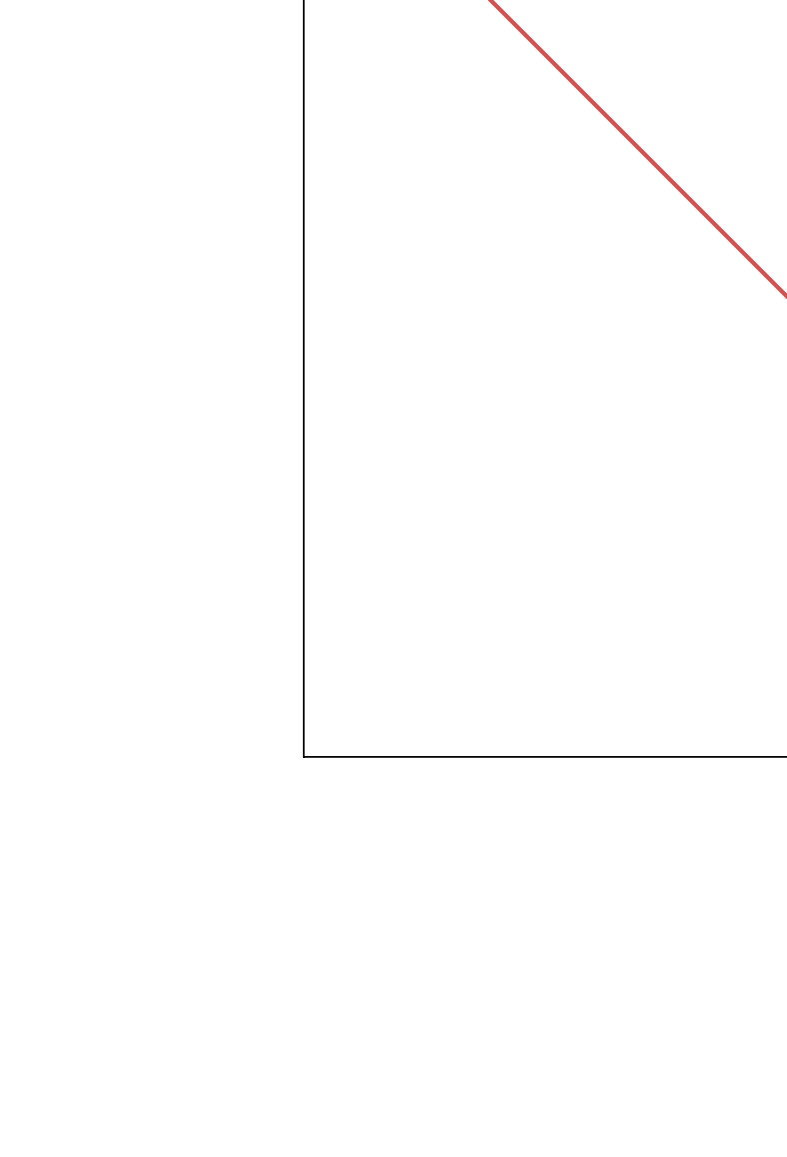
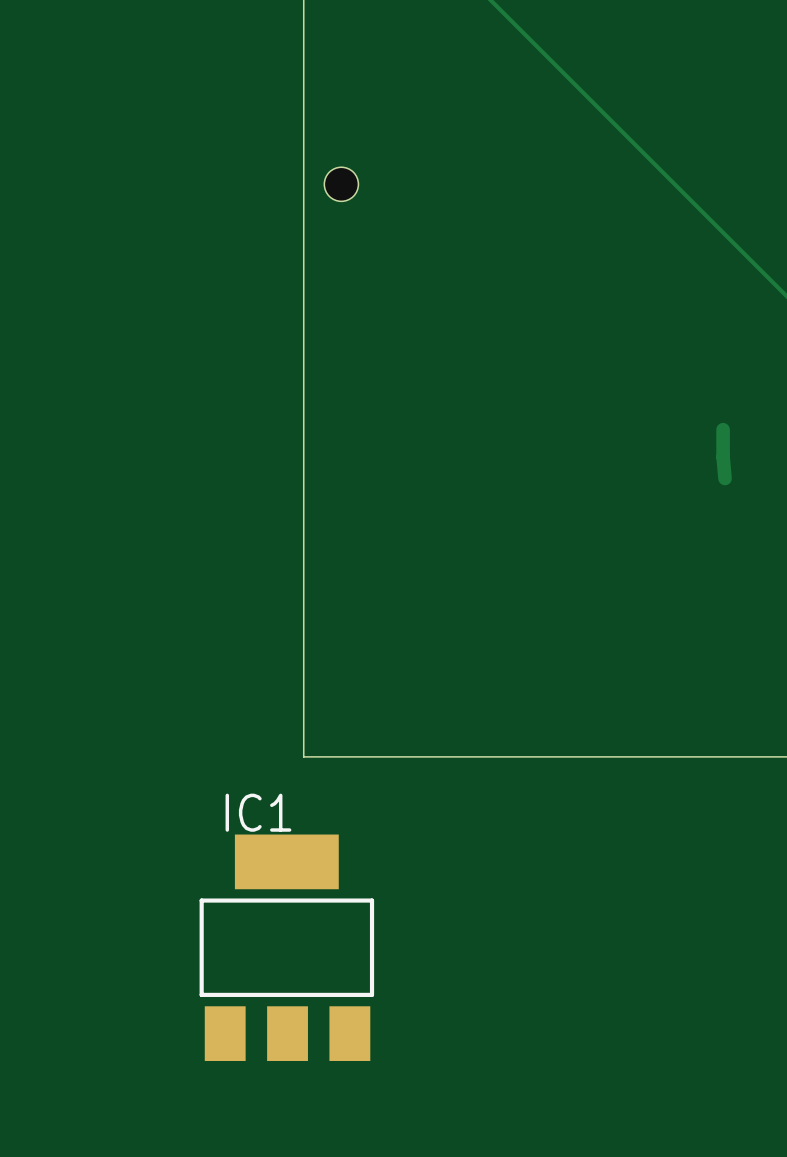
hole: none -> (341, 184)
track: none -> (723, 429) (725, 478)
IC1: none -> (286, 947)

